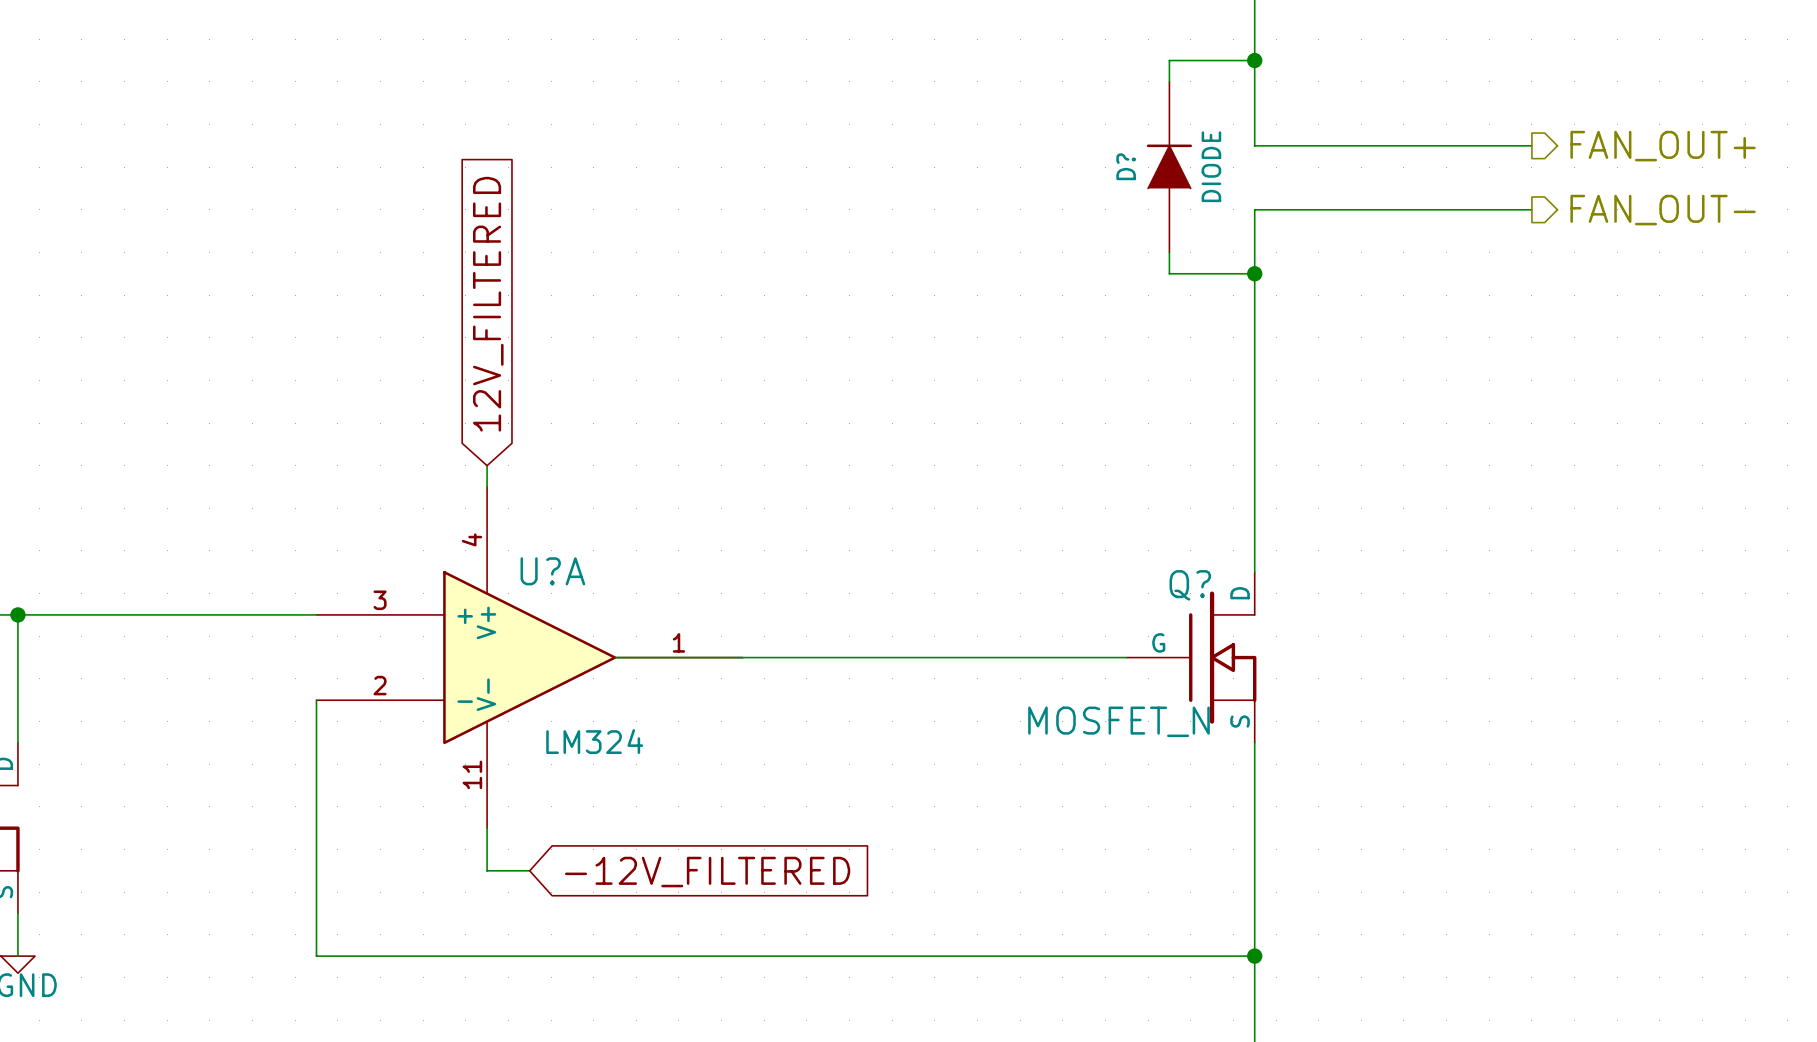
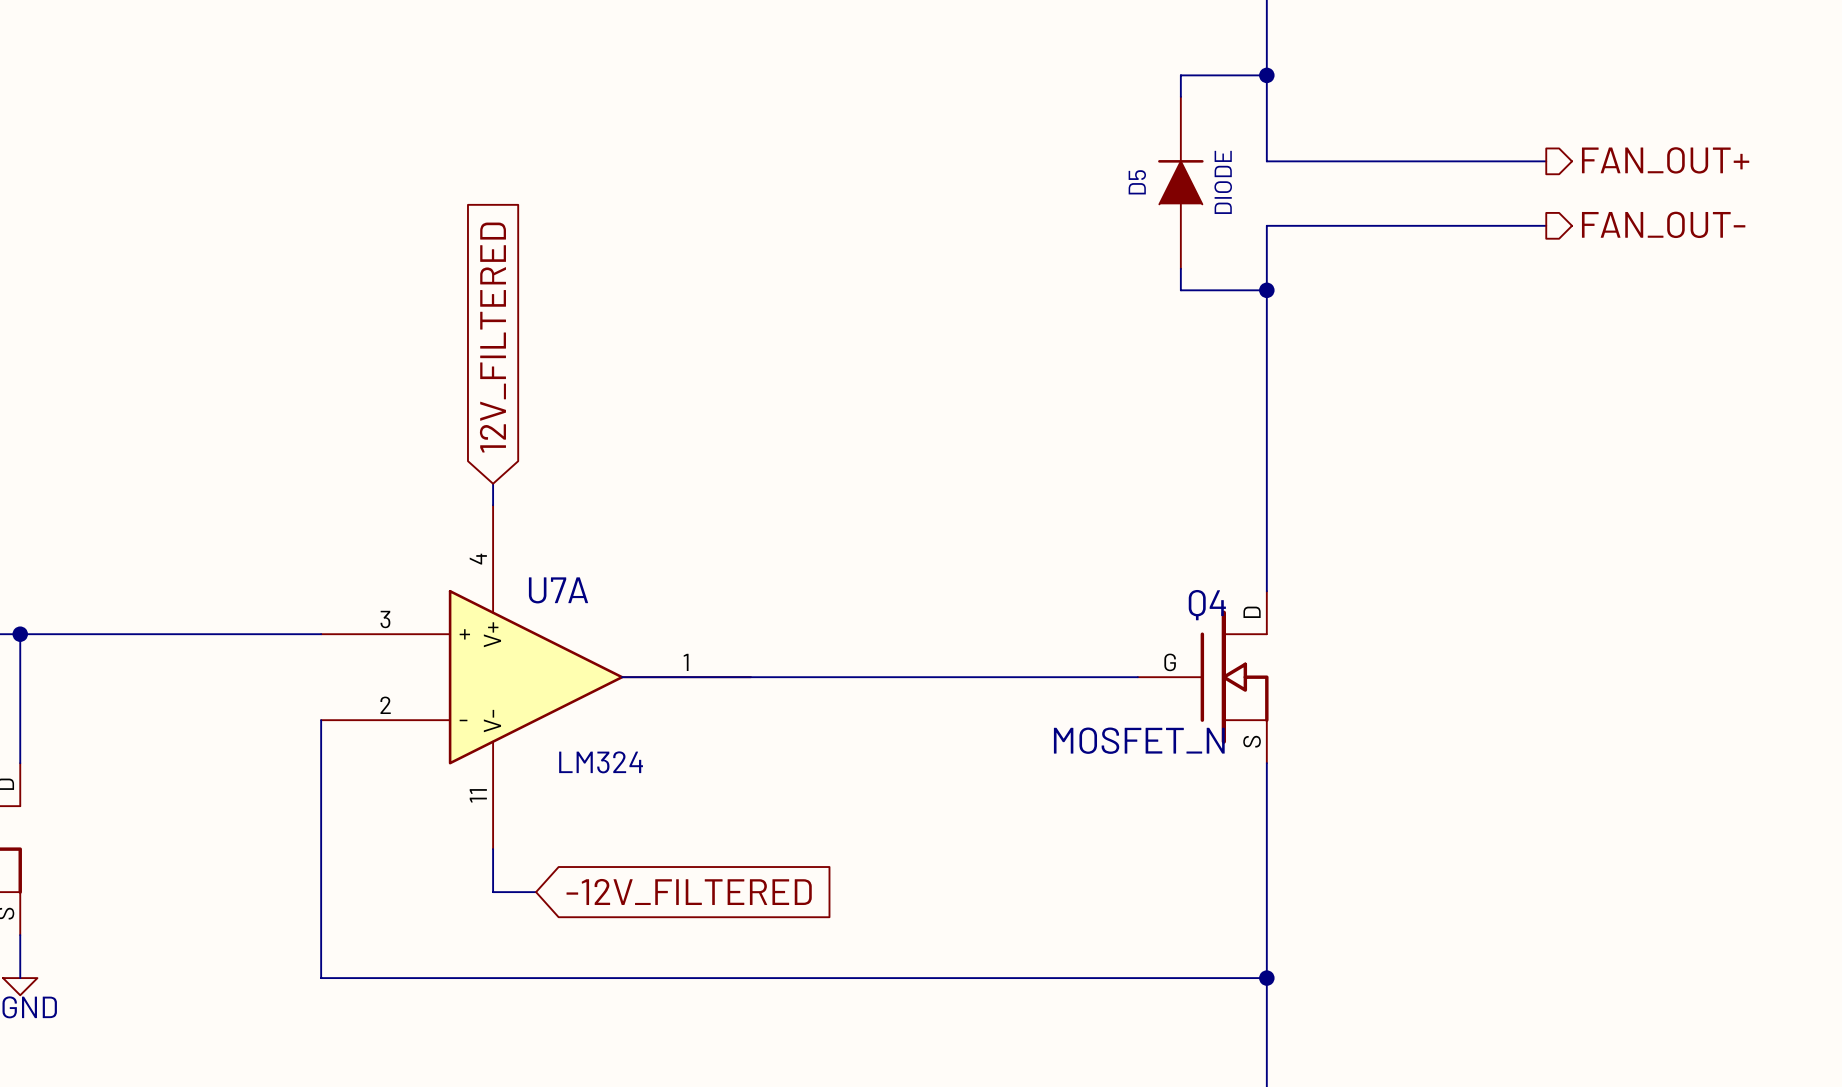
D? name: D? (1126, 166) -> D5 (1137, 182)
U?A name: U?A (552, 571) -> U7A (558, 590)
Q? name: Q? (1190, 585) -> Q4 (1207, 605)

